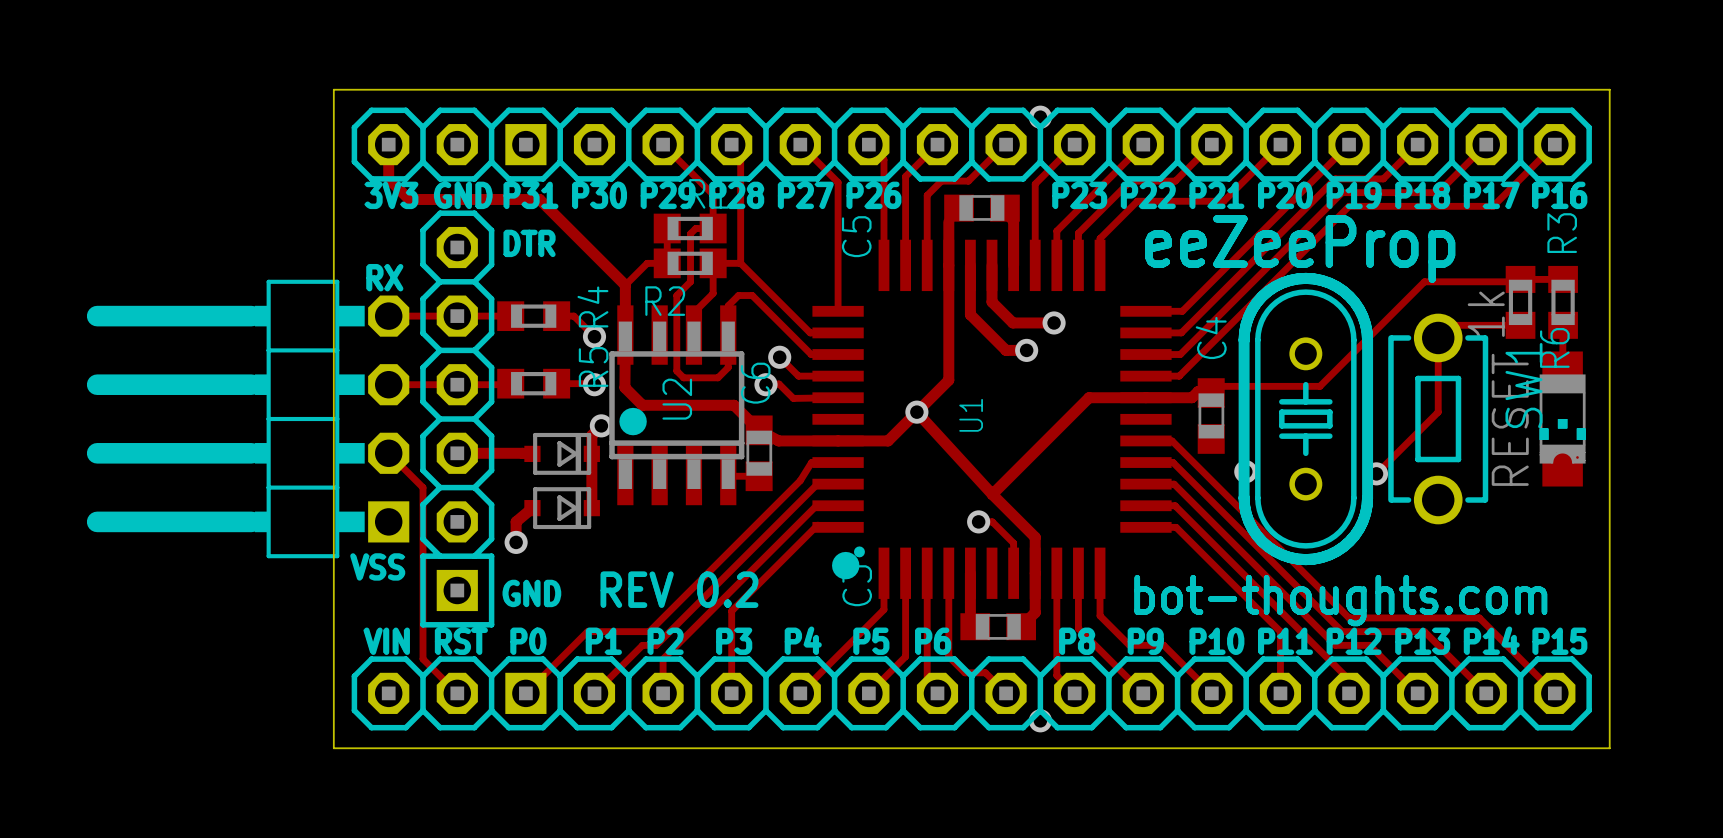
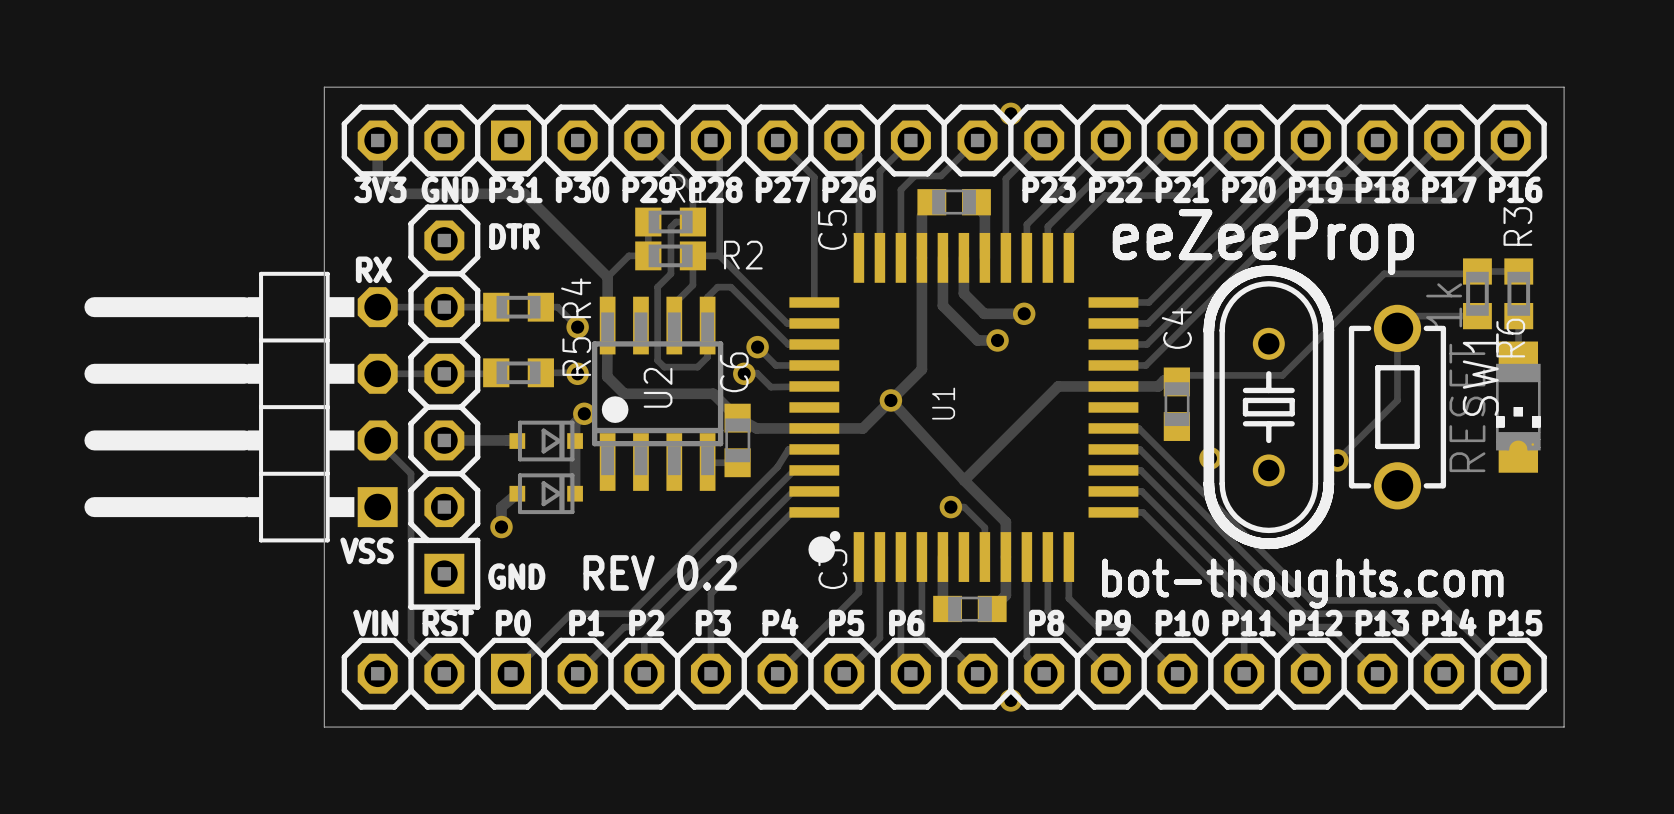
R2 name position: R2 (665, 301) -> R2 (743, 255)

